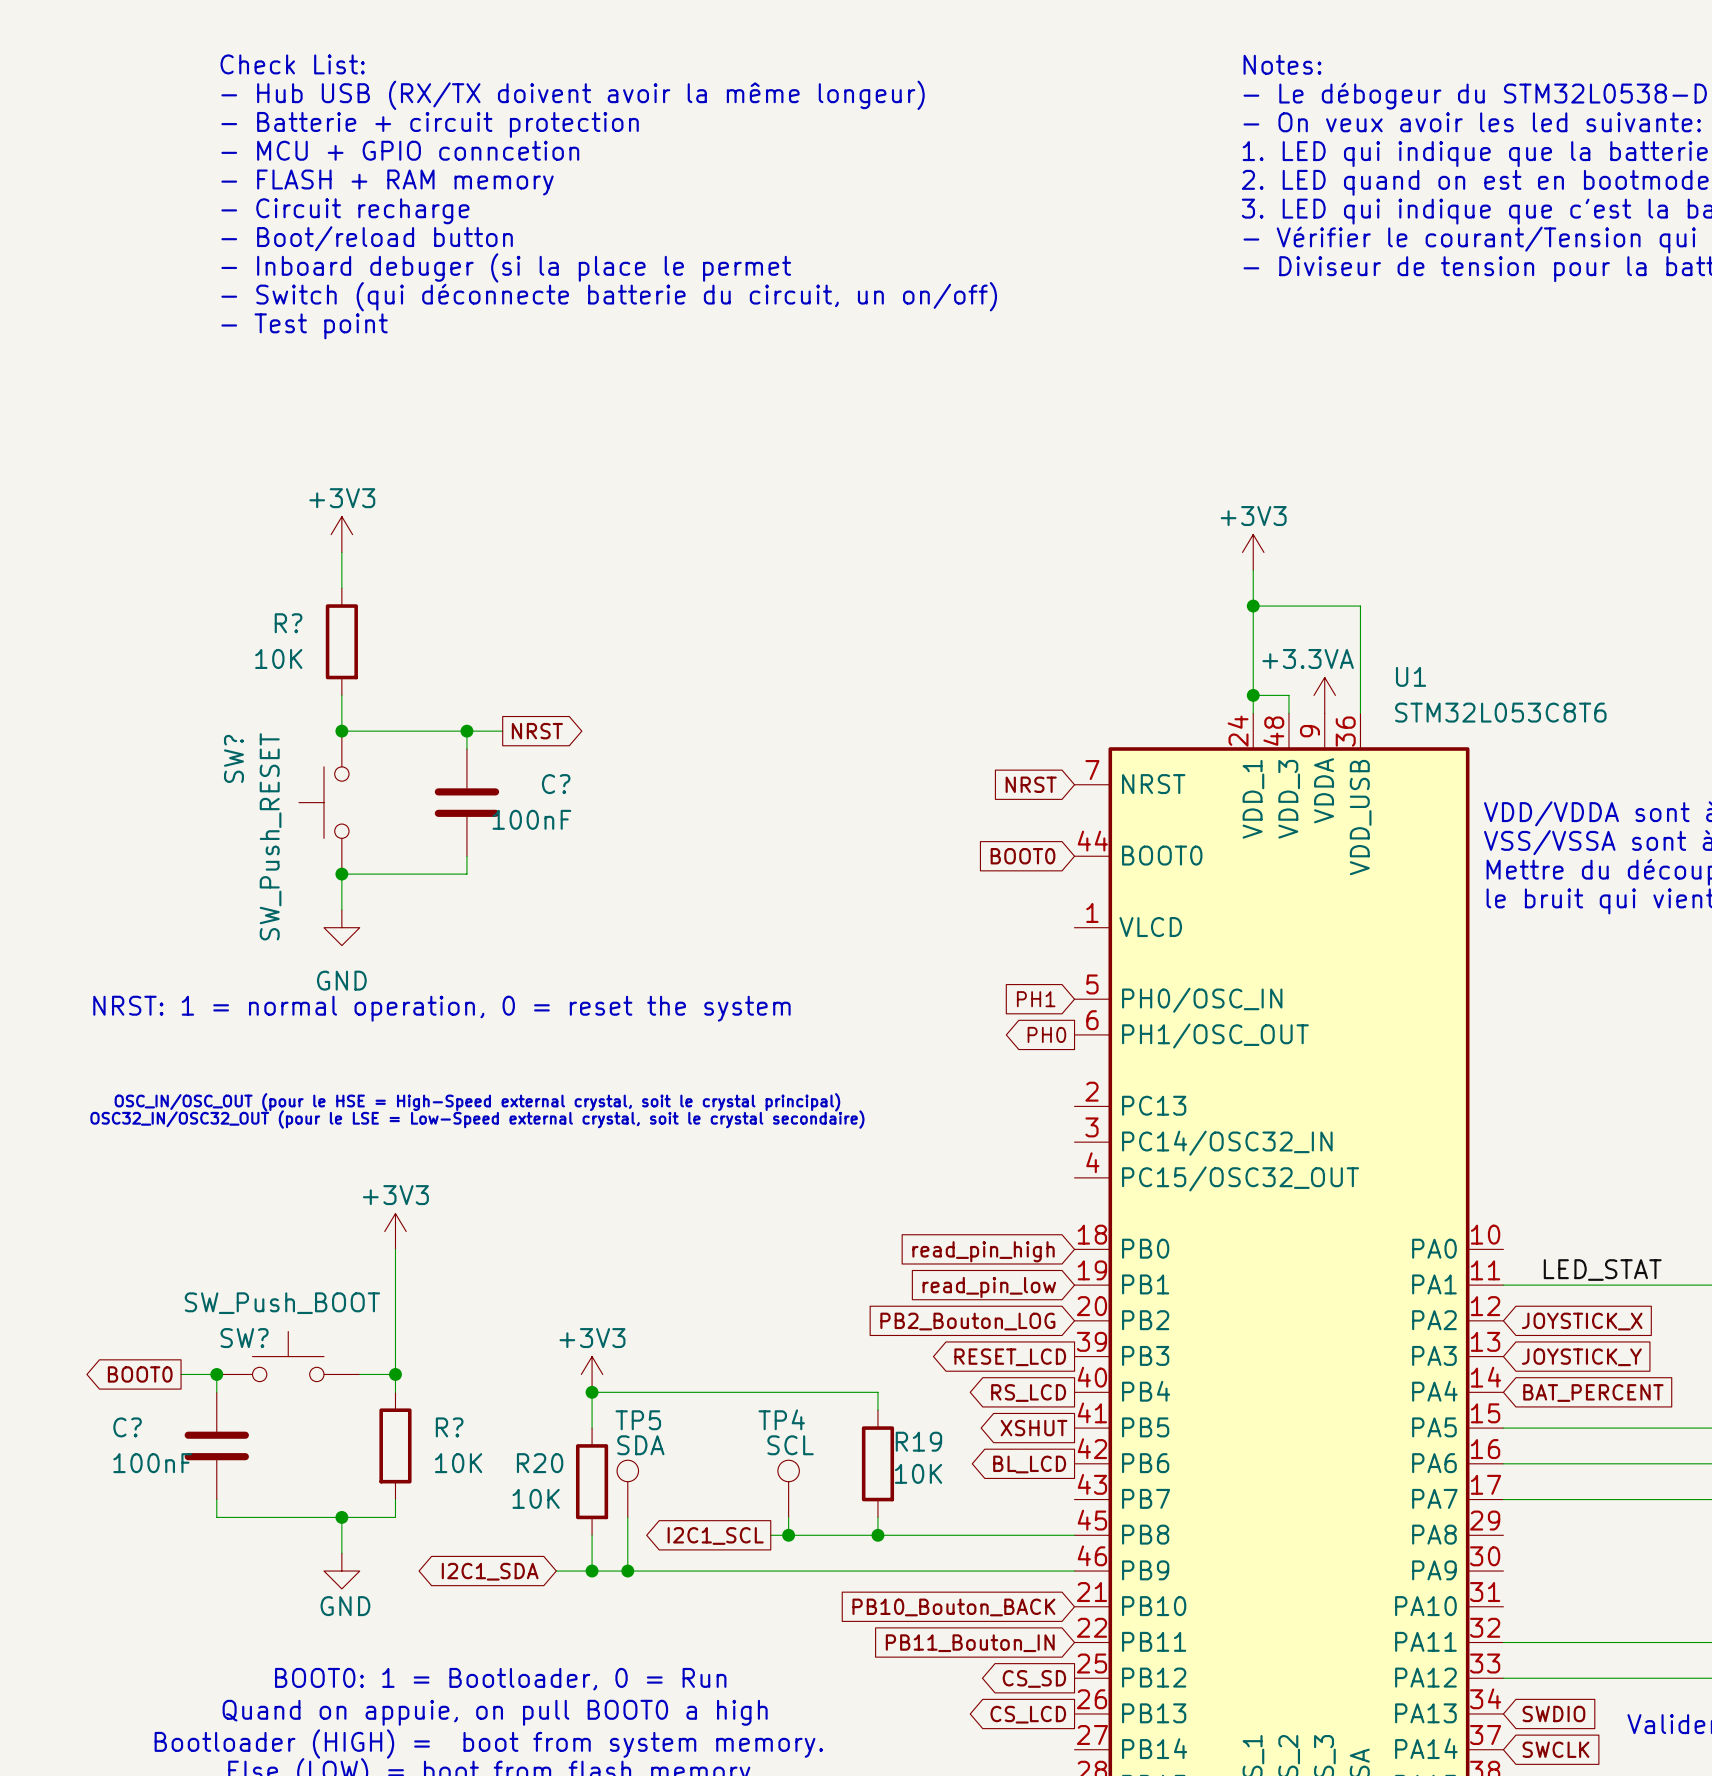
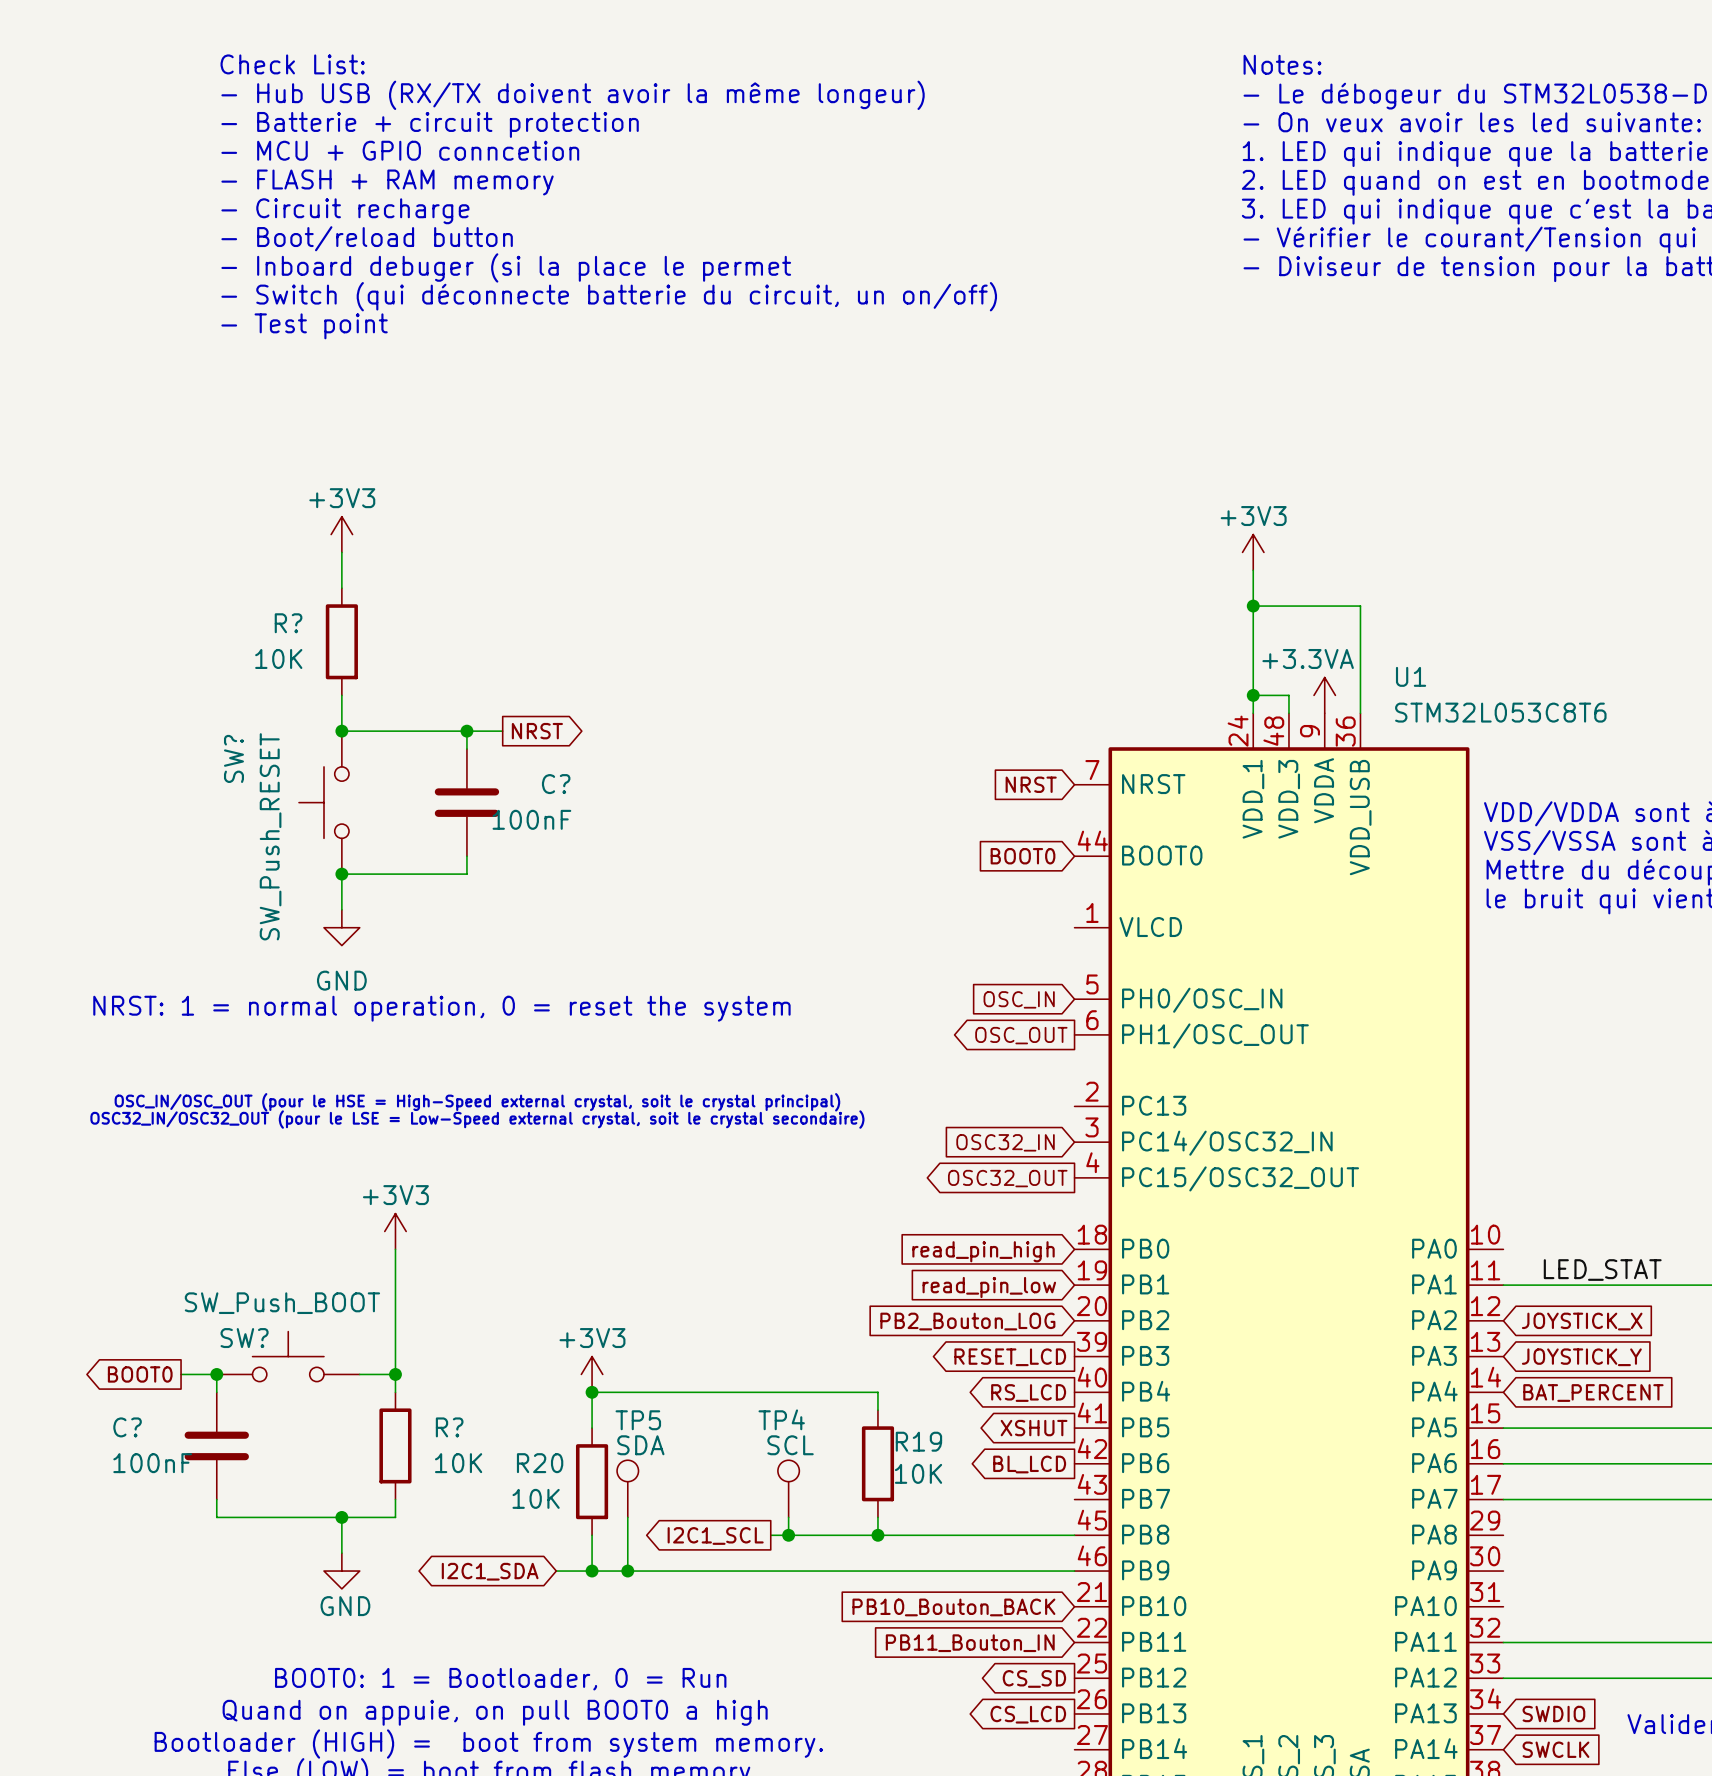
global label: PH1 (1036, 999) -> OSC_IN (1019, 999)
global label: PH0 (1046, 1034) -> OSC_OUT (1021, 1035)
global label: none -> OSC32_IN (1005, 1142)
global label: none -> OSC32_OUT (1007, 1178)

